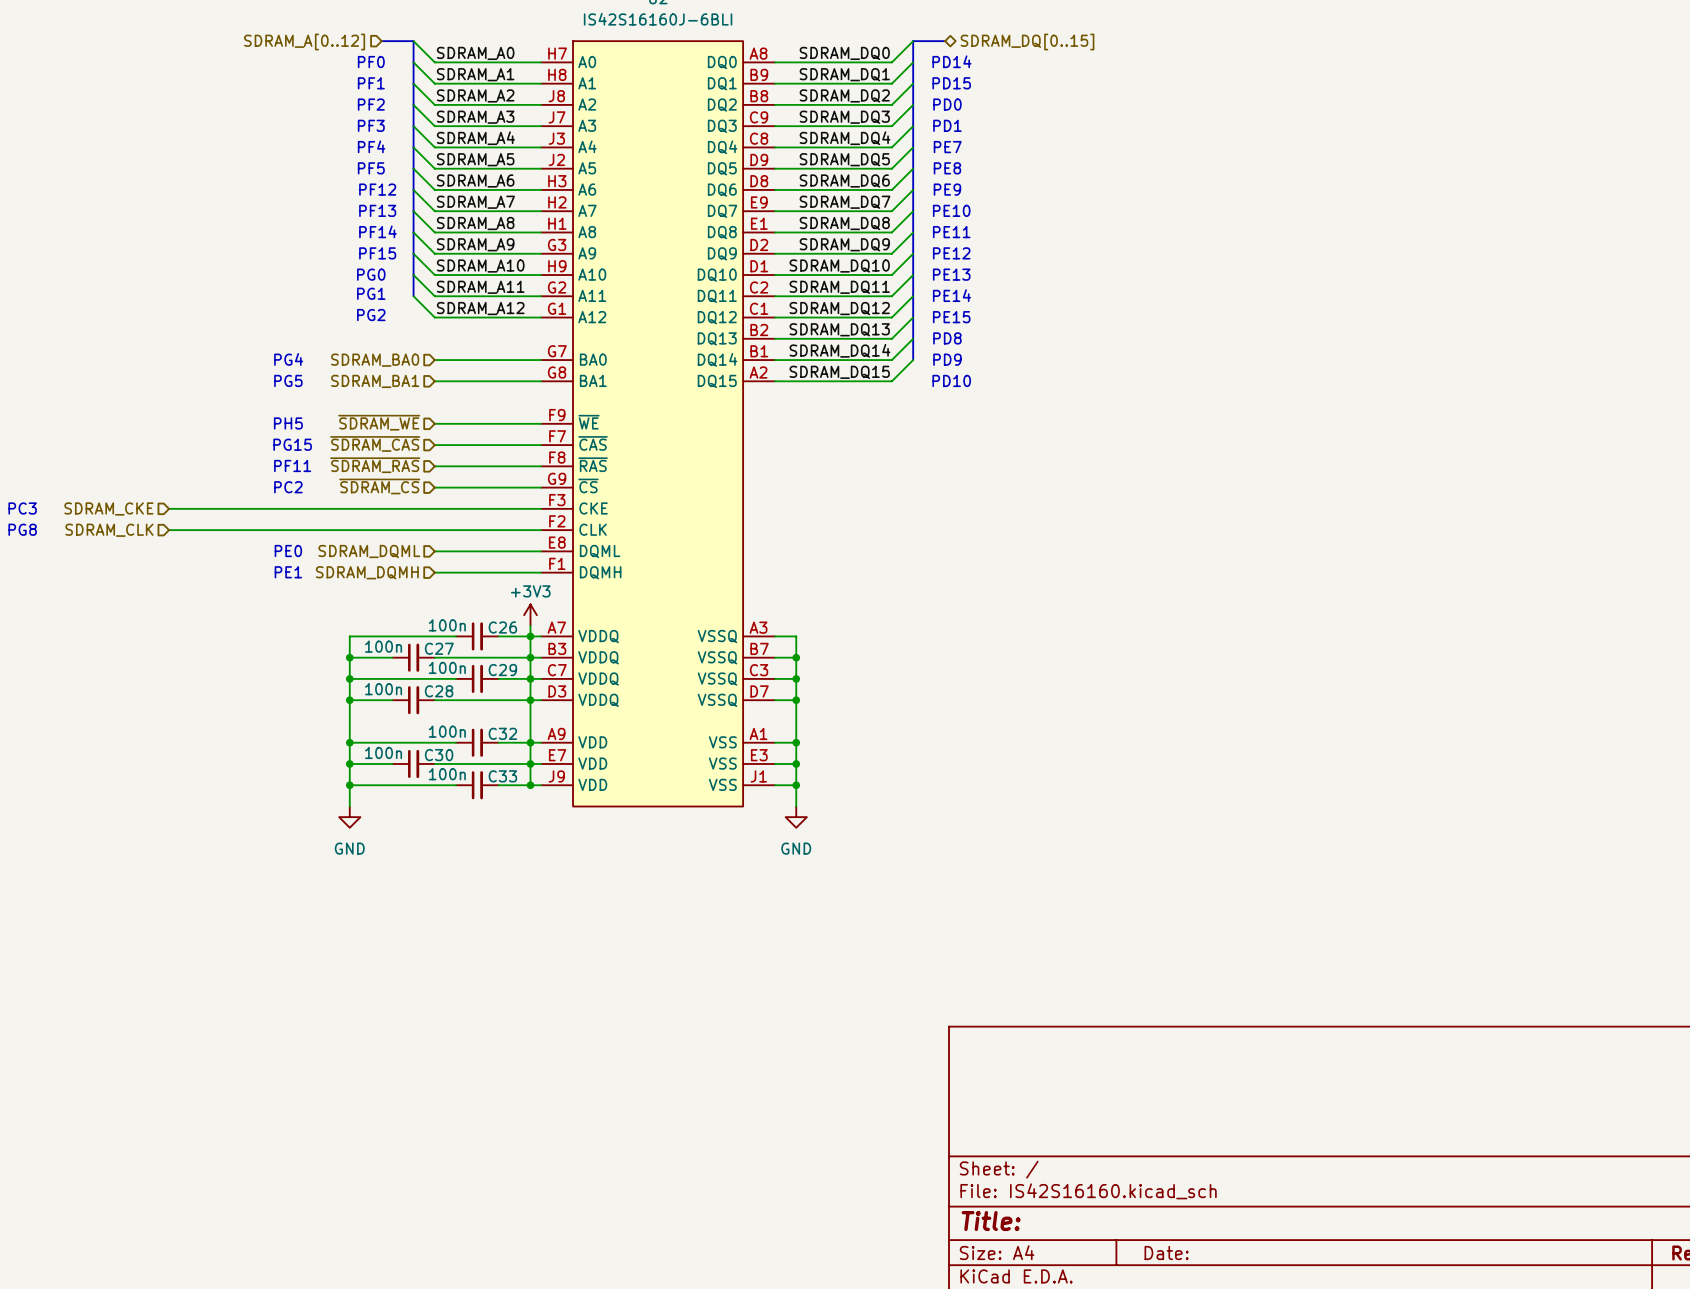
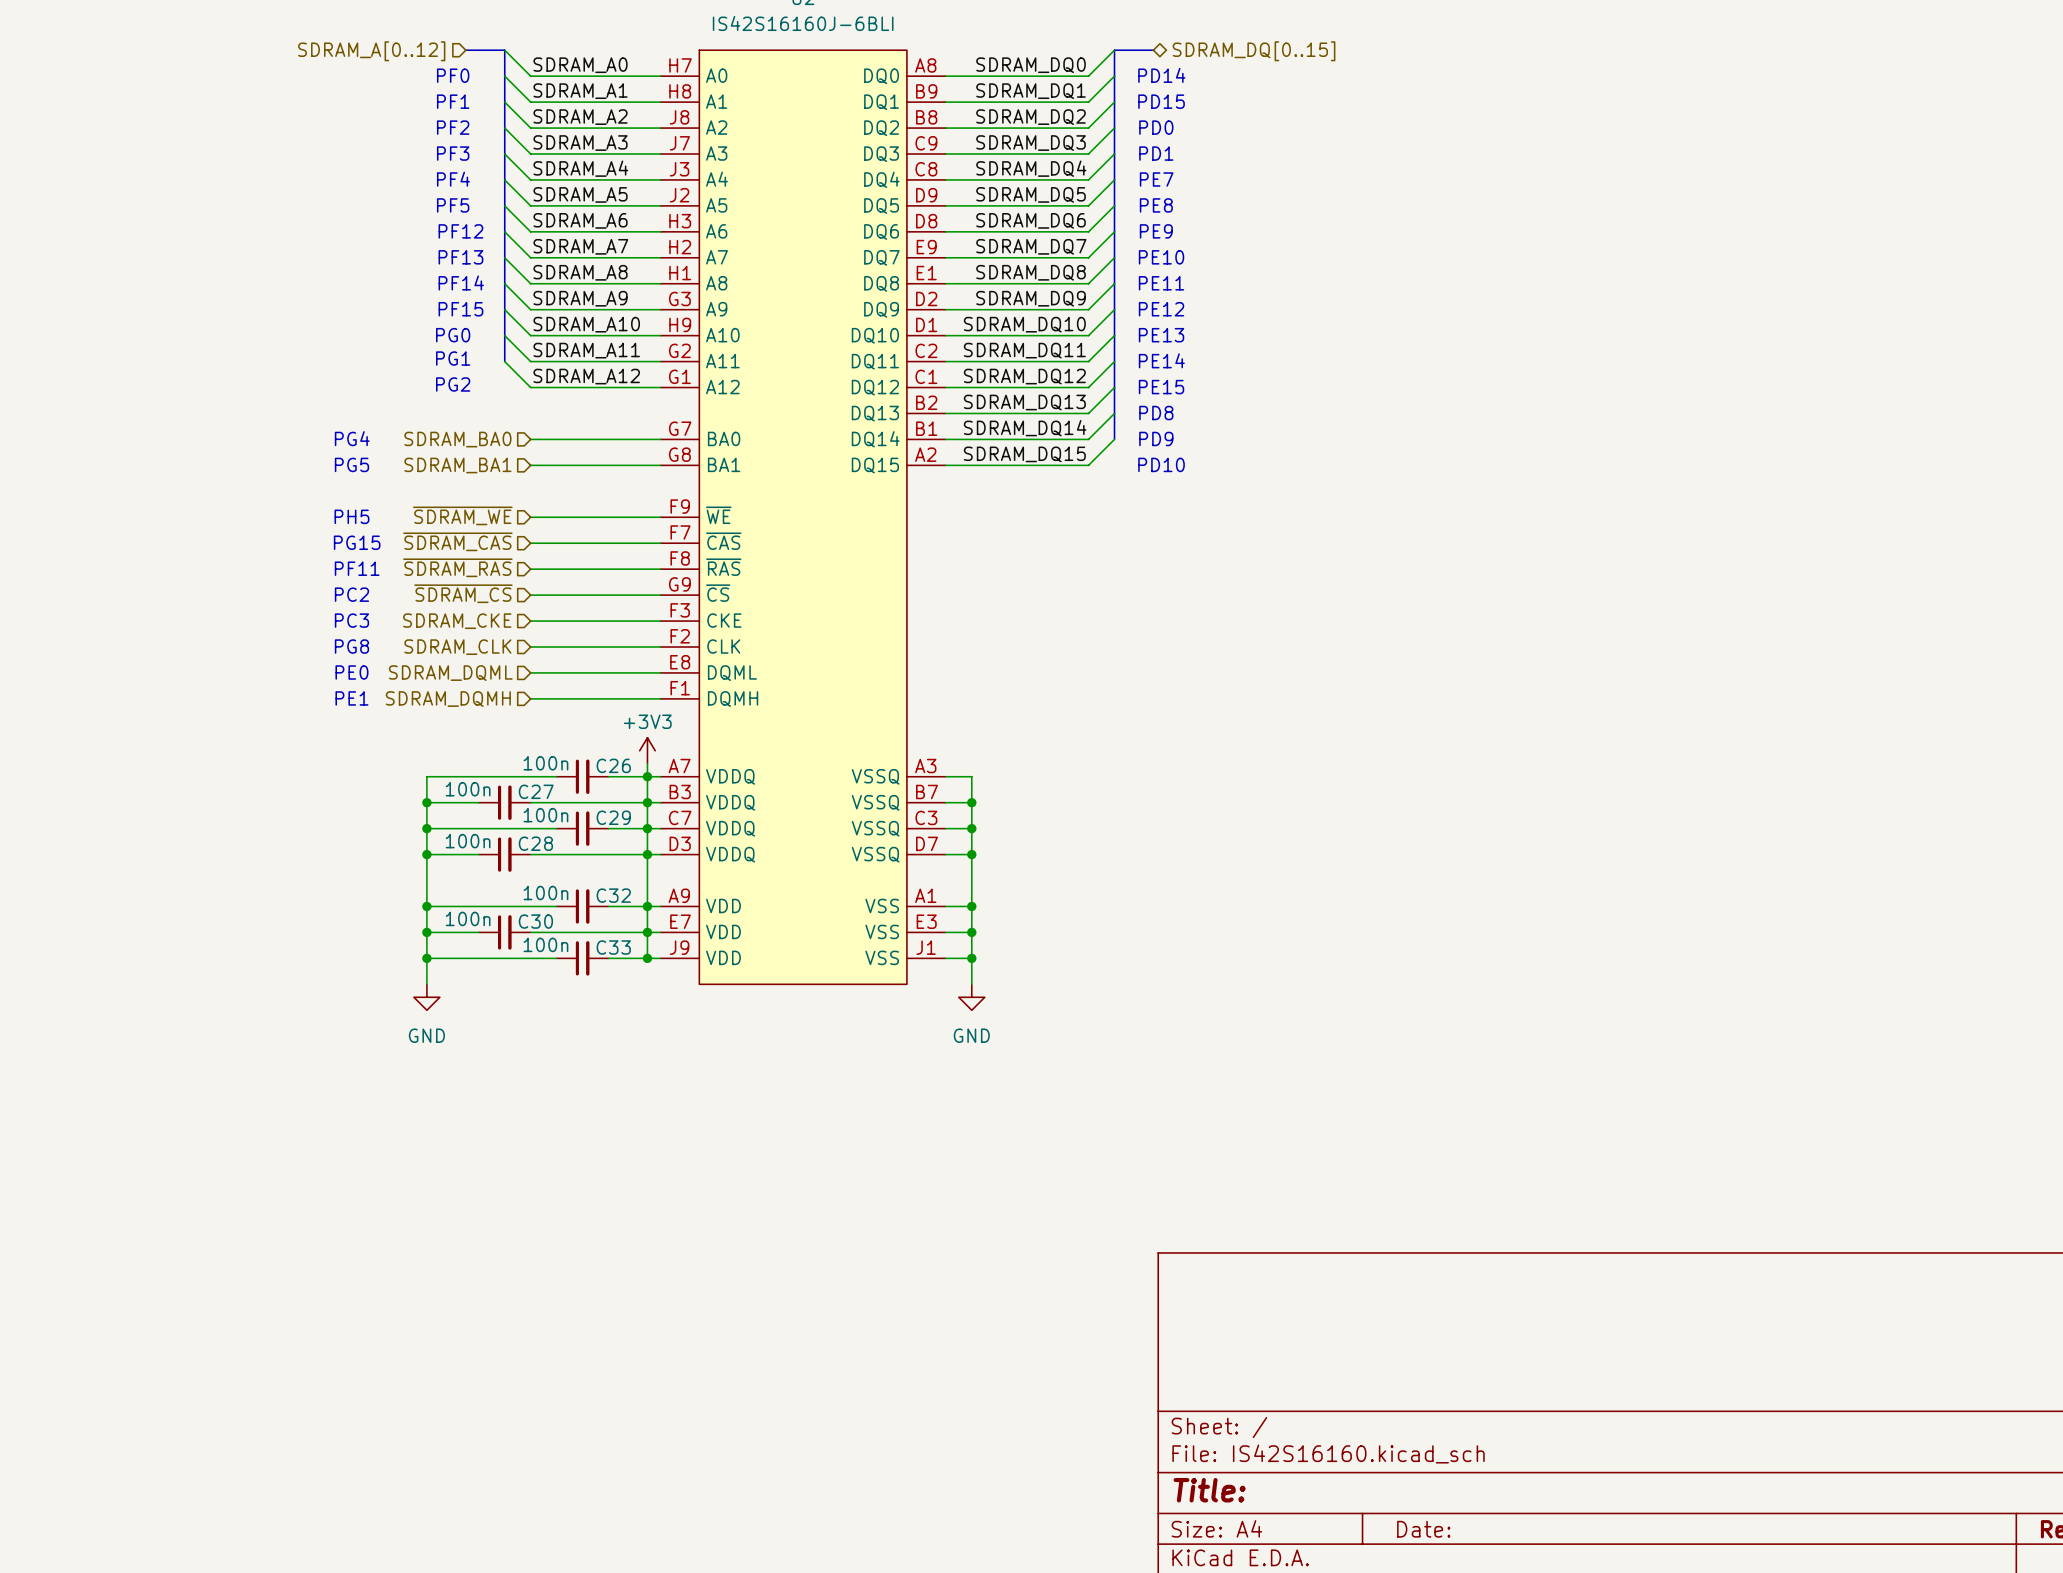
text: PC3 (22, 508) -> none
hierarchical label: SDRAM_CKE (108, 508) -> none
wire: (169, 508) (434, 508) -> none
text: none -> PC3 (351, 620)
hierarchical label: none -> SDRAM_CKE (457, 621)
text: PG8 (22, 529) -> none
text: none -> PG8 (351, 646)
hierarchical label: SDRAM_CLK (109, 530) -> none
wire: (169, 530) (434, 530) -> none
hierarchical label: none -> SDRAM_CLK (457, 647)

